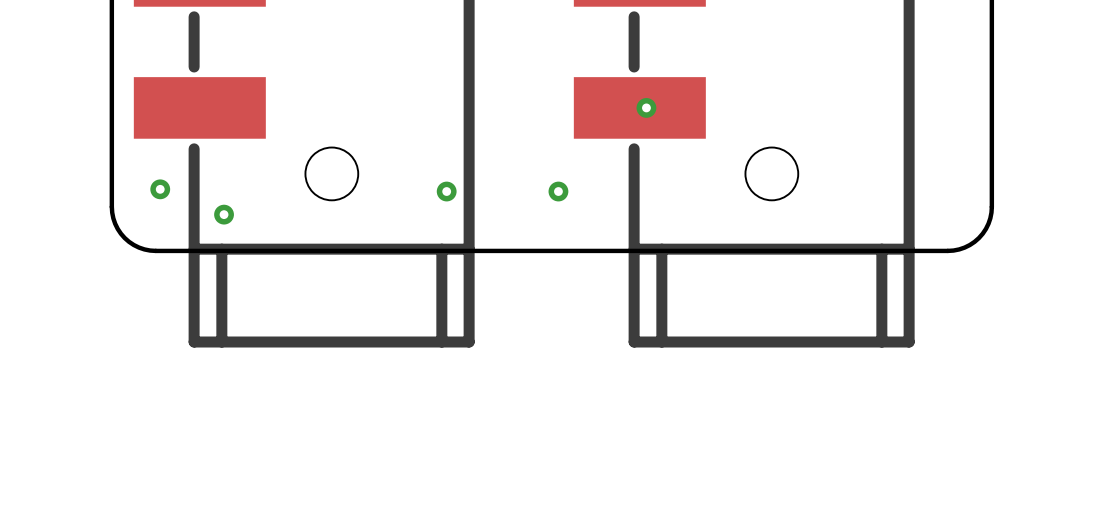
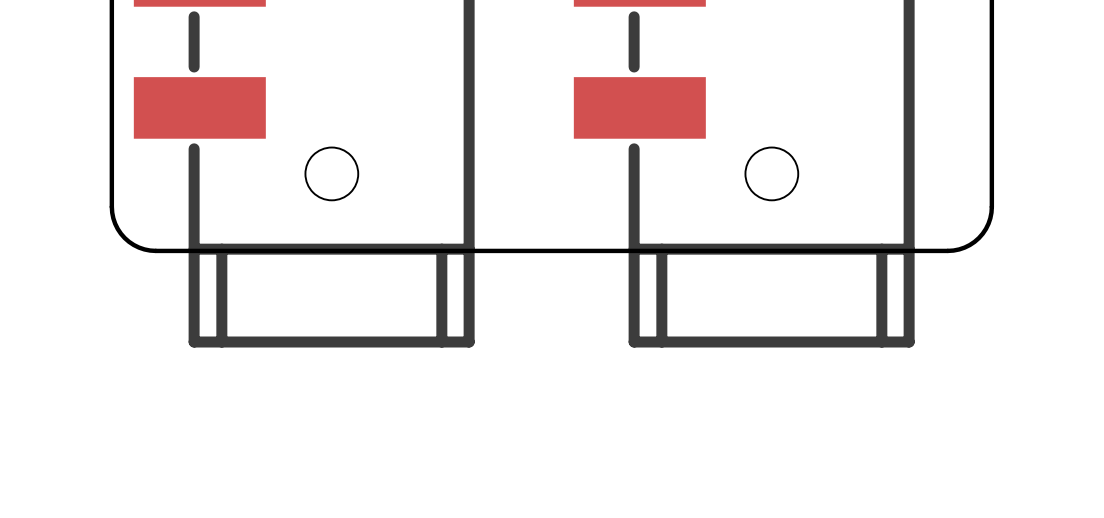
via: (646, 107) -> none
via: (160, 189) -> none
via: (446, 191) -> none
via: (558, 191) -> none
via: (224, 214) -> none

